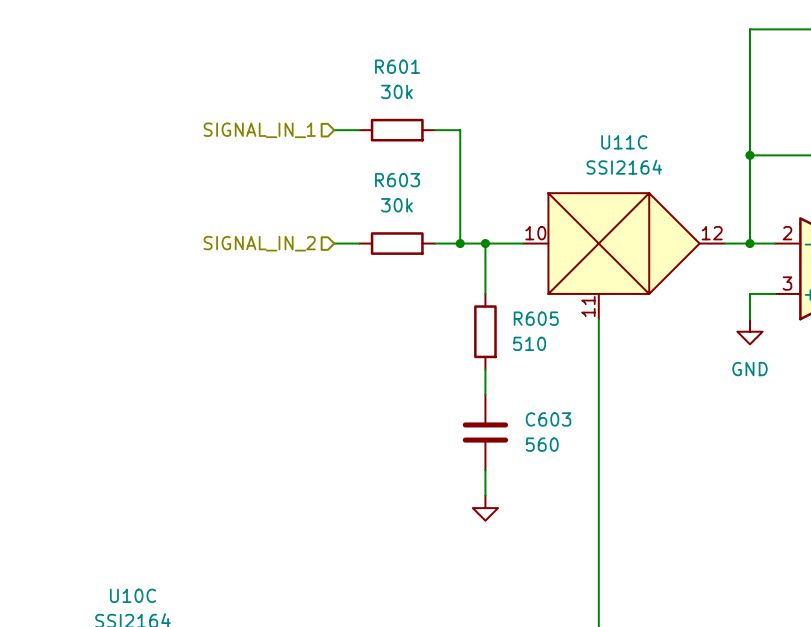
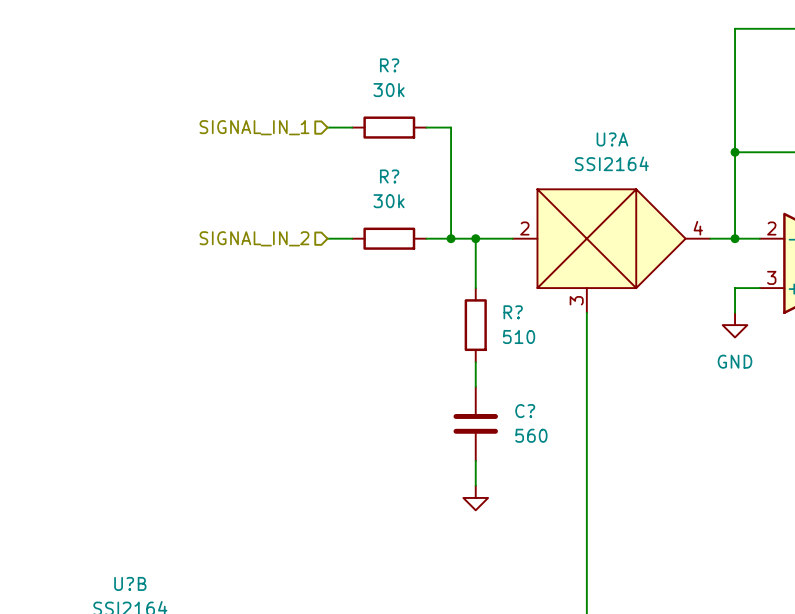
R601 name: R601 (397, 66) -> R? (389, 65)
U11C name: U11C (624, 142) -> U?A (612, 139)
R603 name: R603 (397, 180) -> R? (389, 176)
U11C pin number: 10 (535, 233) -> 2 (524, 228)
U11C pin number: 12 (712, 233) -> 4 (698, 228)
U11C pin number: 11 (588, 306) -> 3 (576, 300)
R605 name: R605 (536, 318) -> R? (513, 312)
C603 name: C603 (548, 419) -> C? (525, 411)
U10C name: U10C (132, 595) -> U?B (130, 583)

